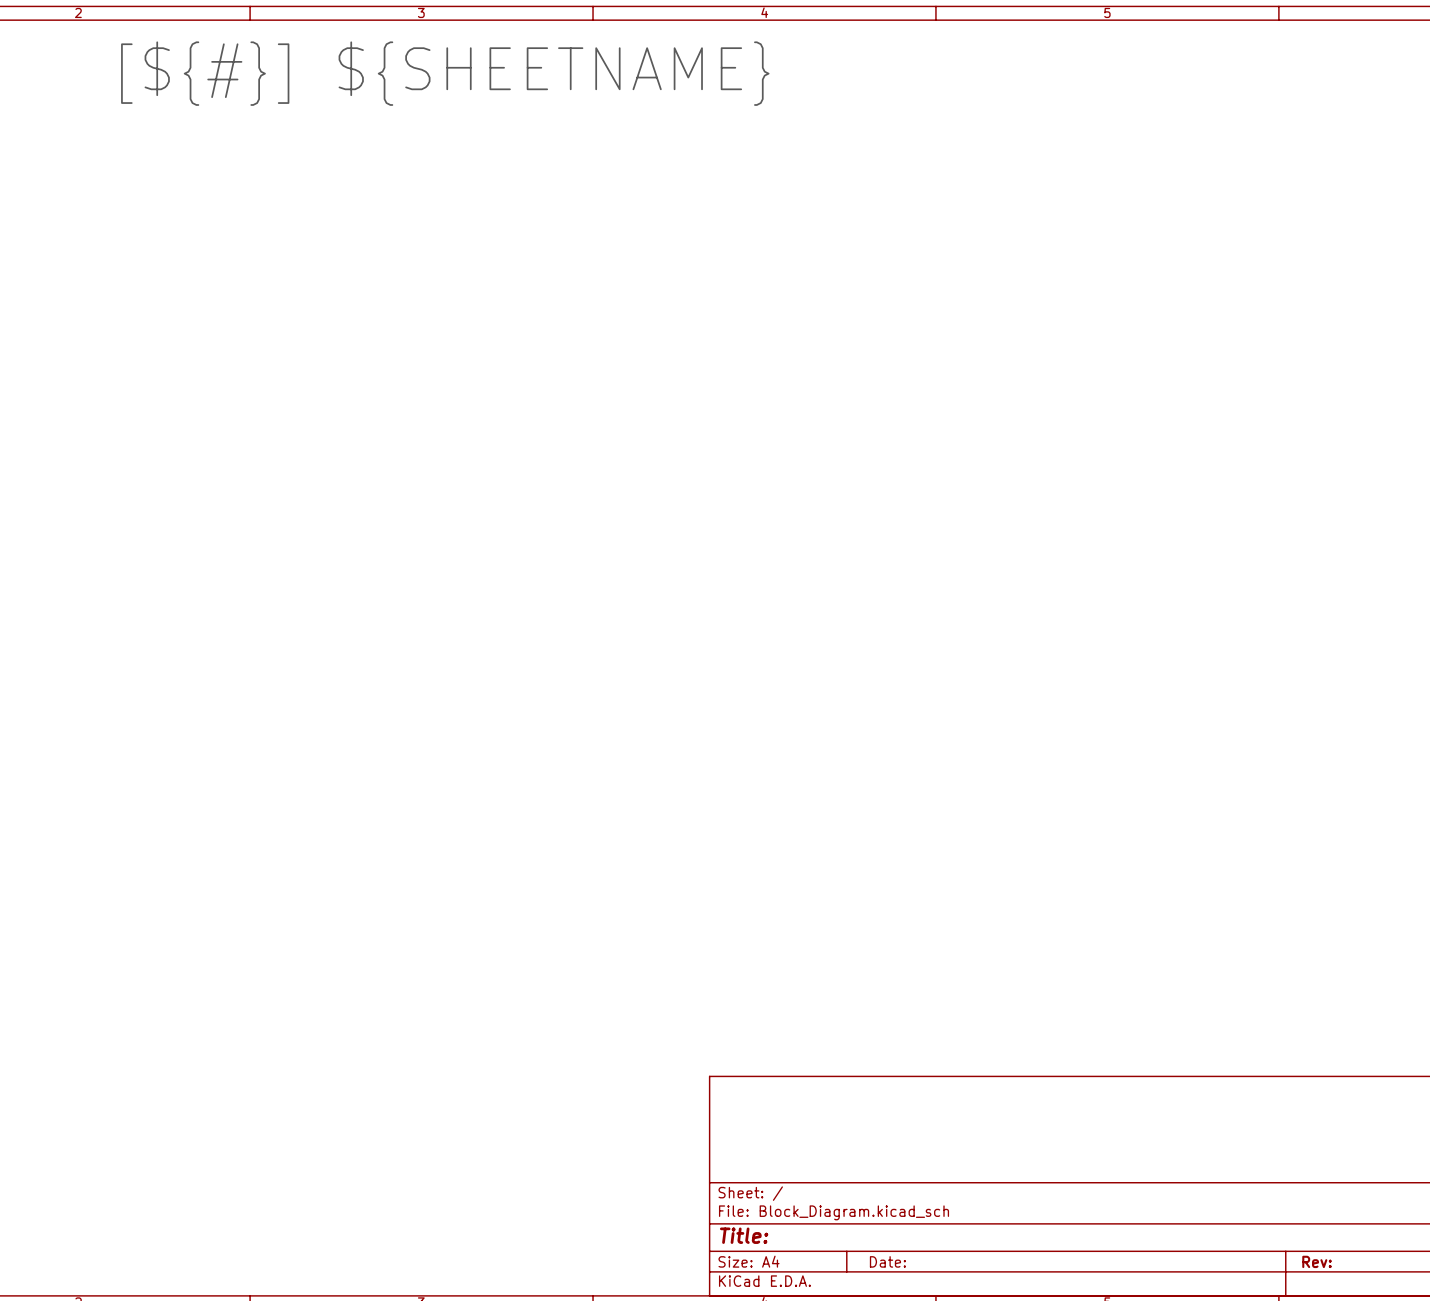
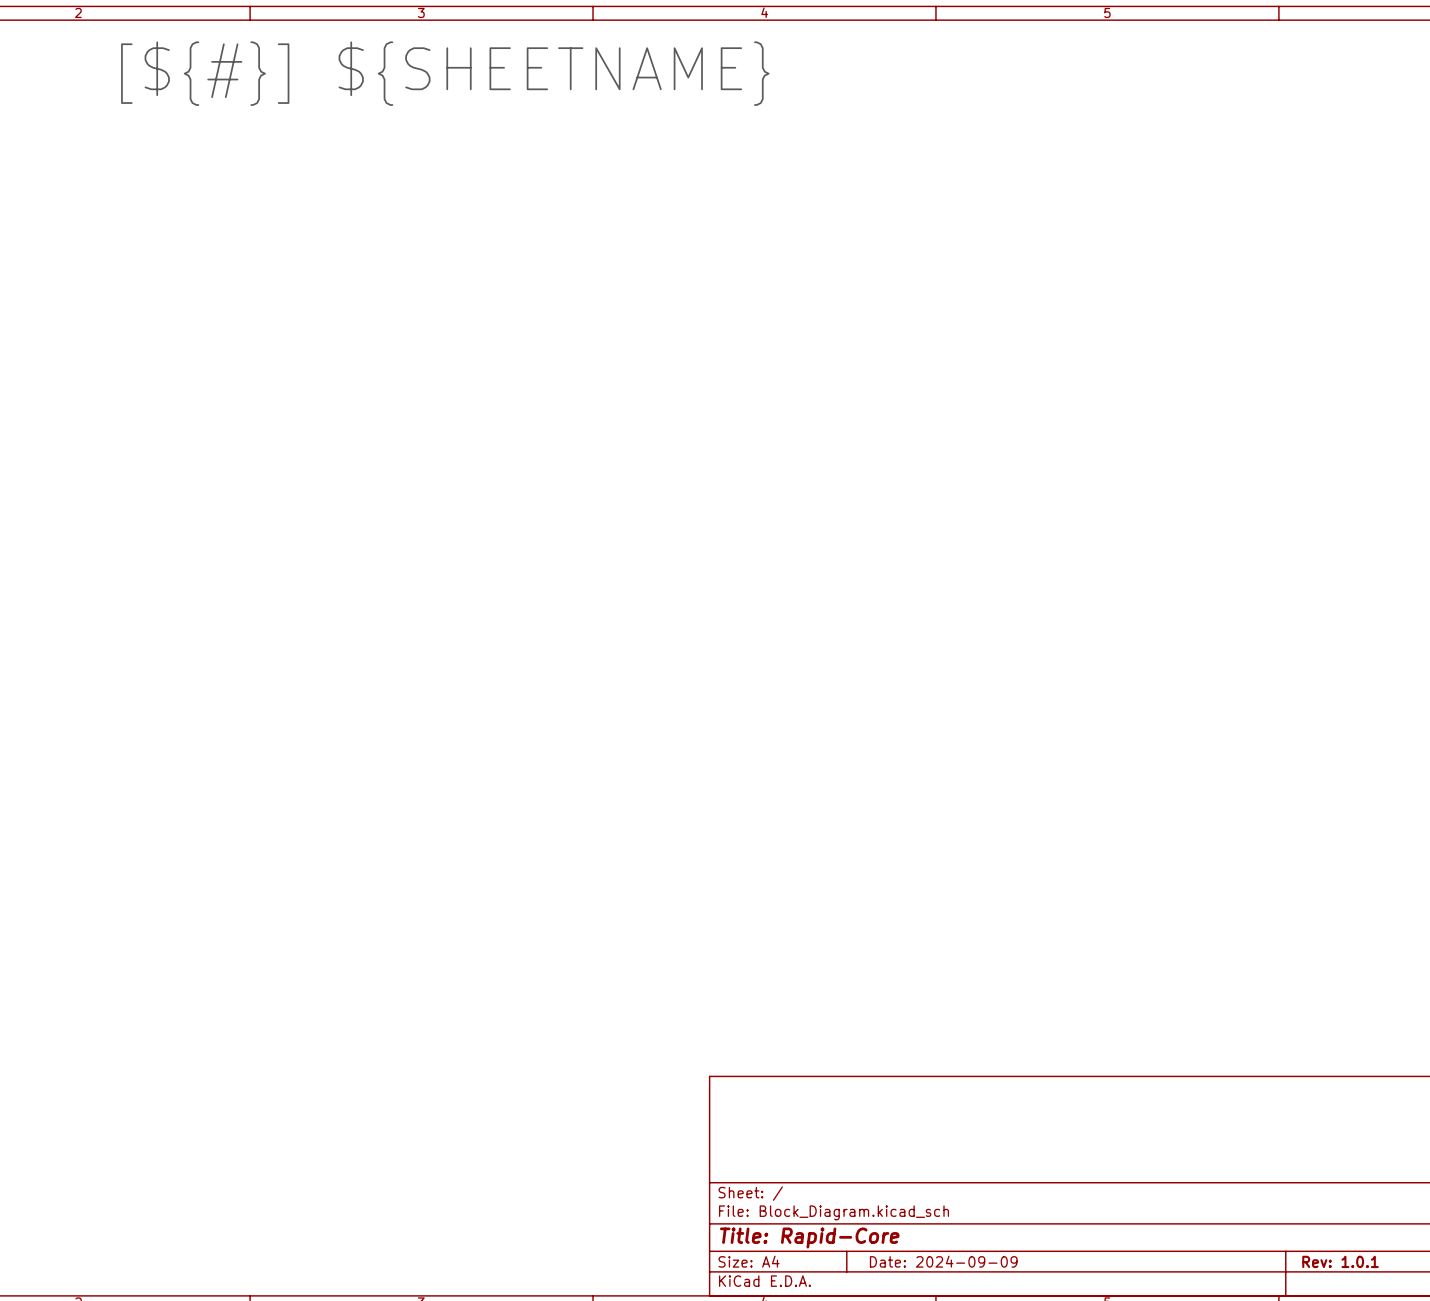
title block: Title: (744, 1235) -> Title: Rapid-Core (809, 1238)
title block: Date: (887, 1261) -> Date: 2024-09-09 (943, 1261)
title block: Rev: (1317, 1261) -> Rev: 1.0.1 (1340, 1261)

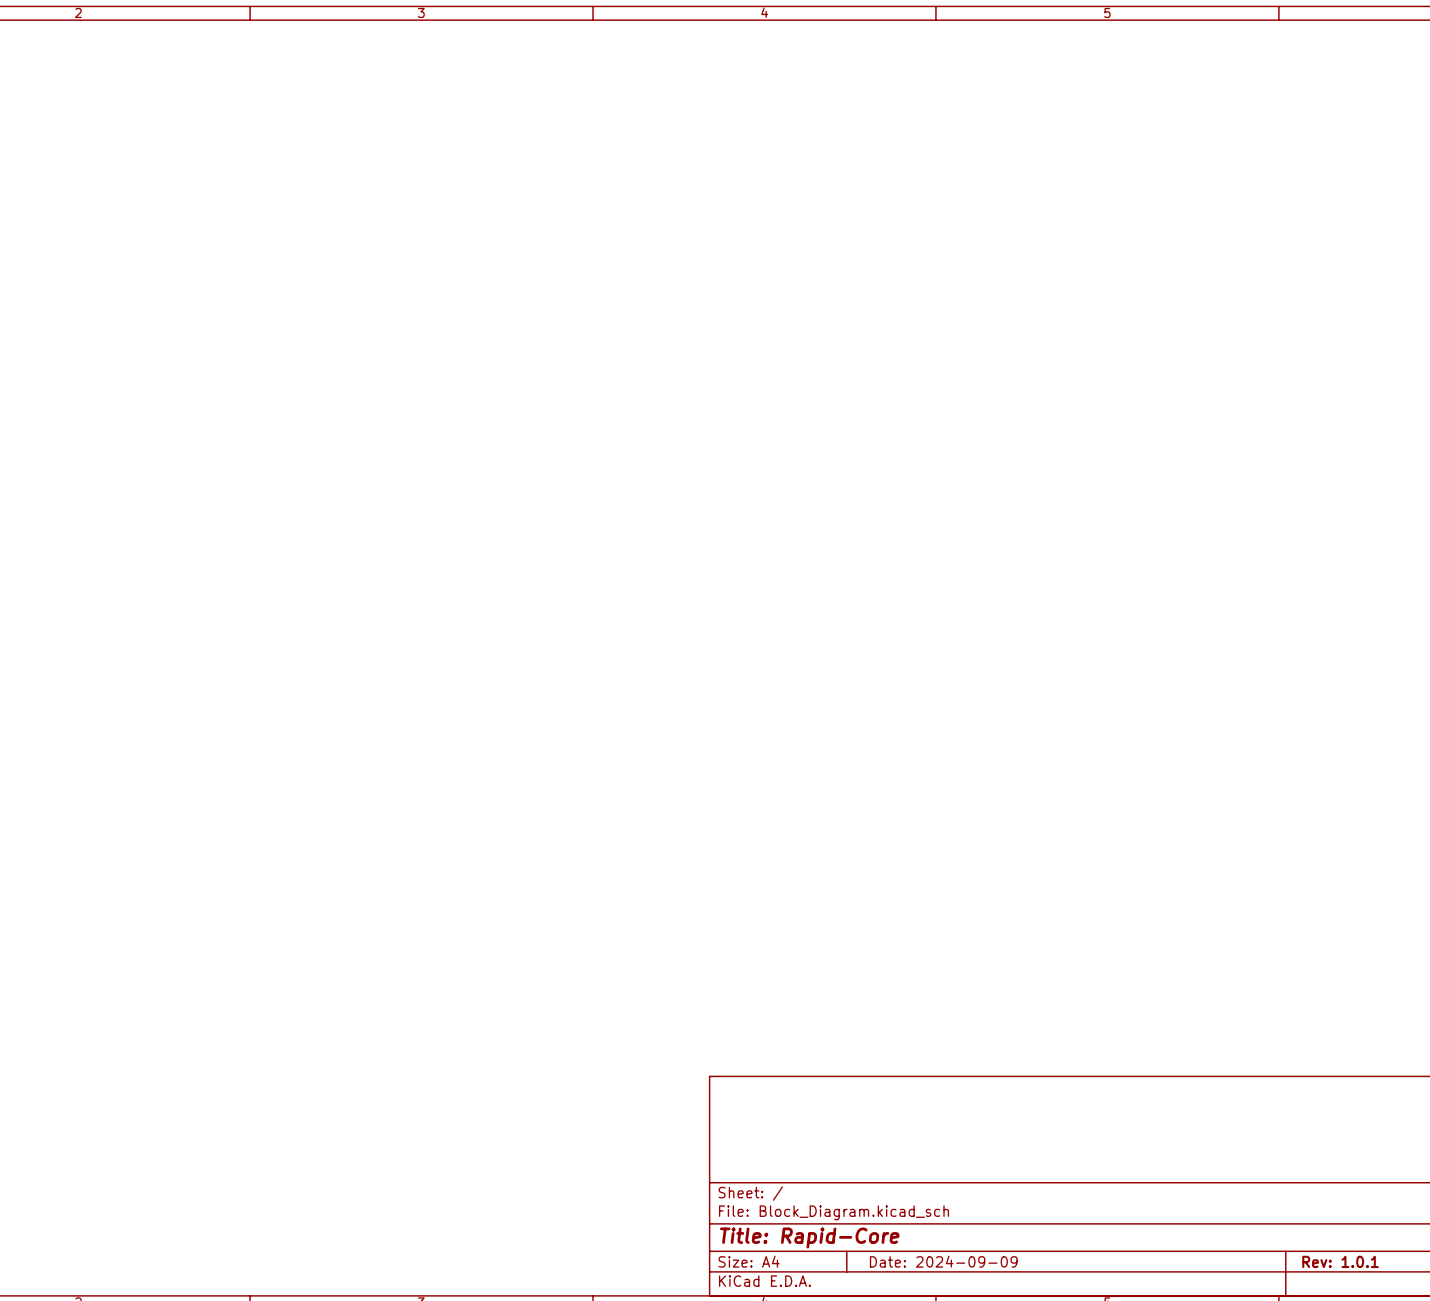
text: [${#}] ${SHEETNAME} (445, 73) -> none

